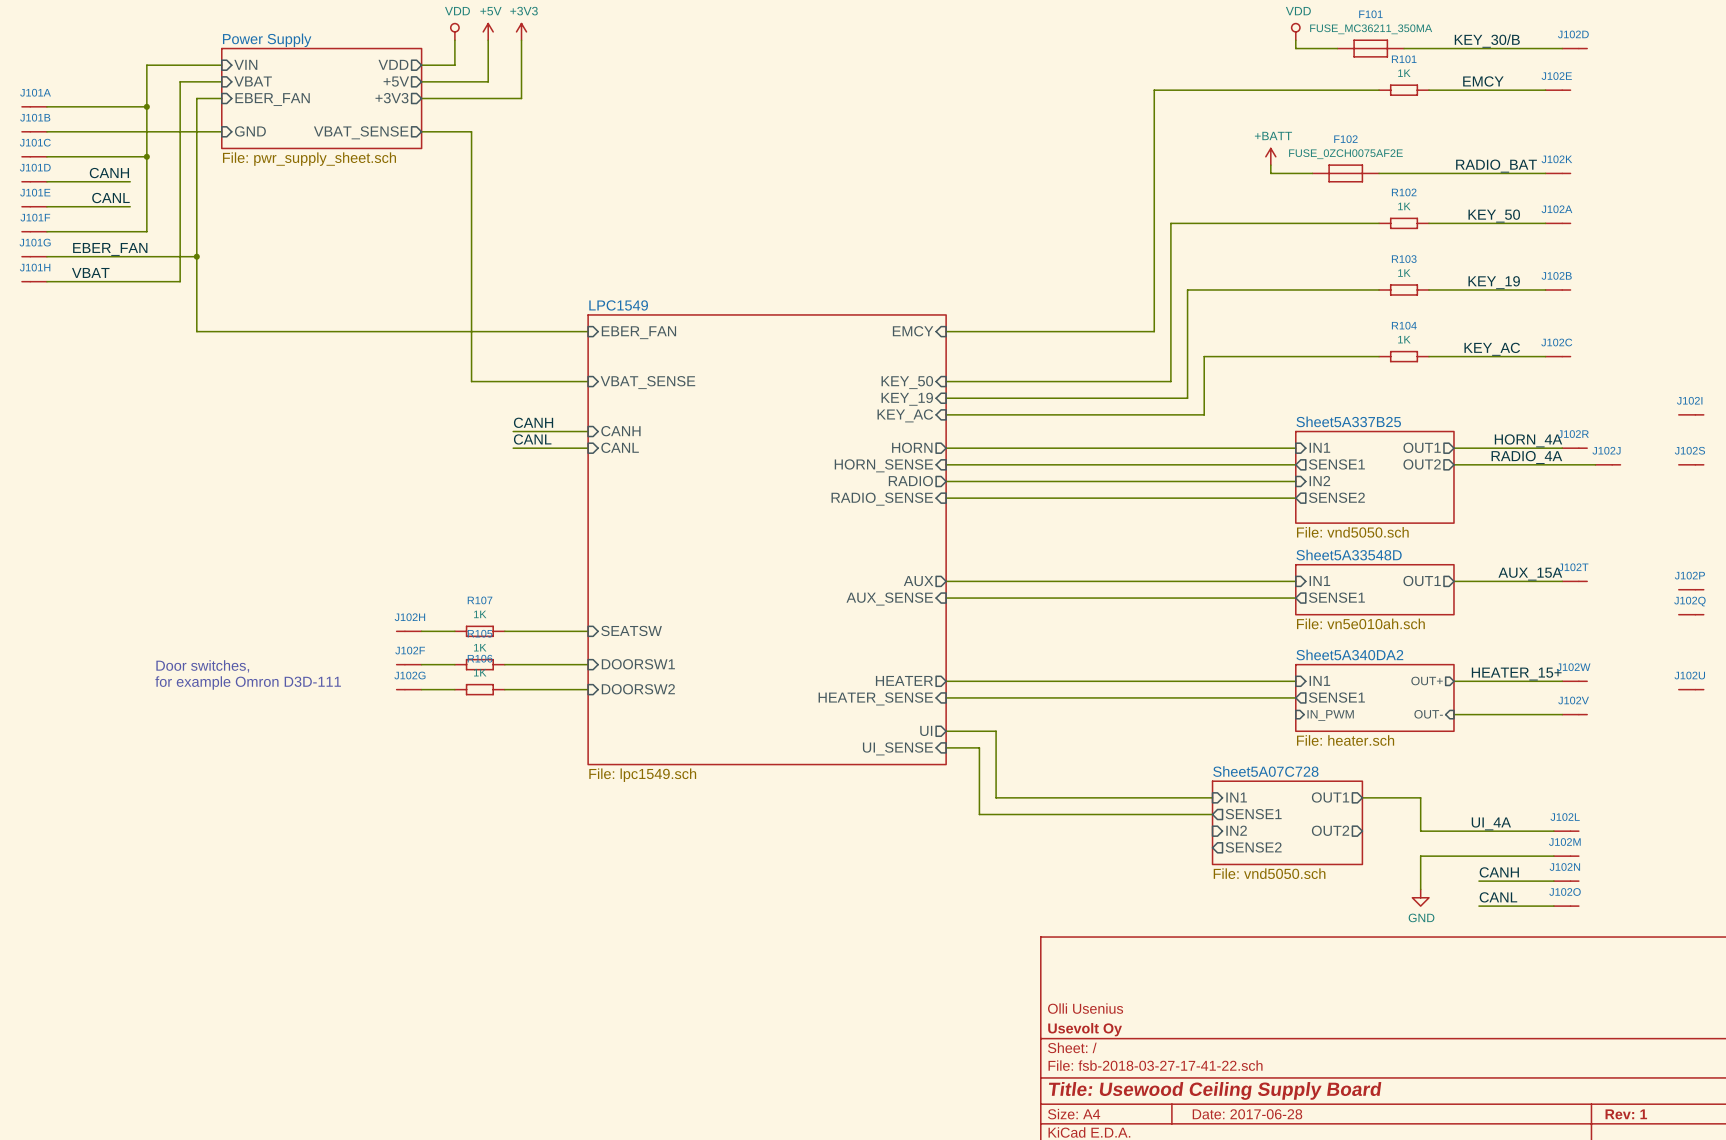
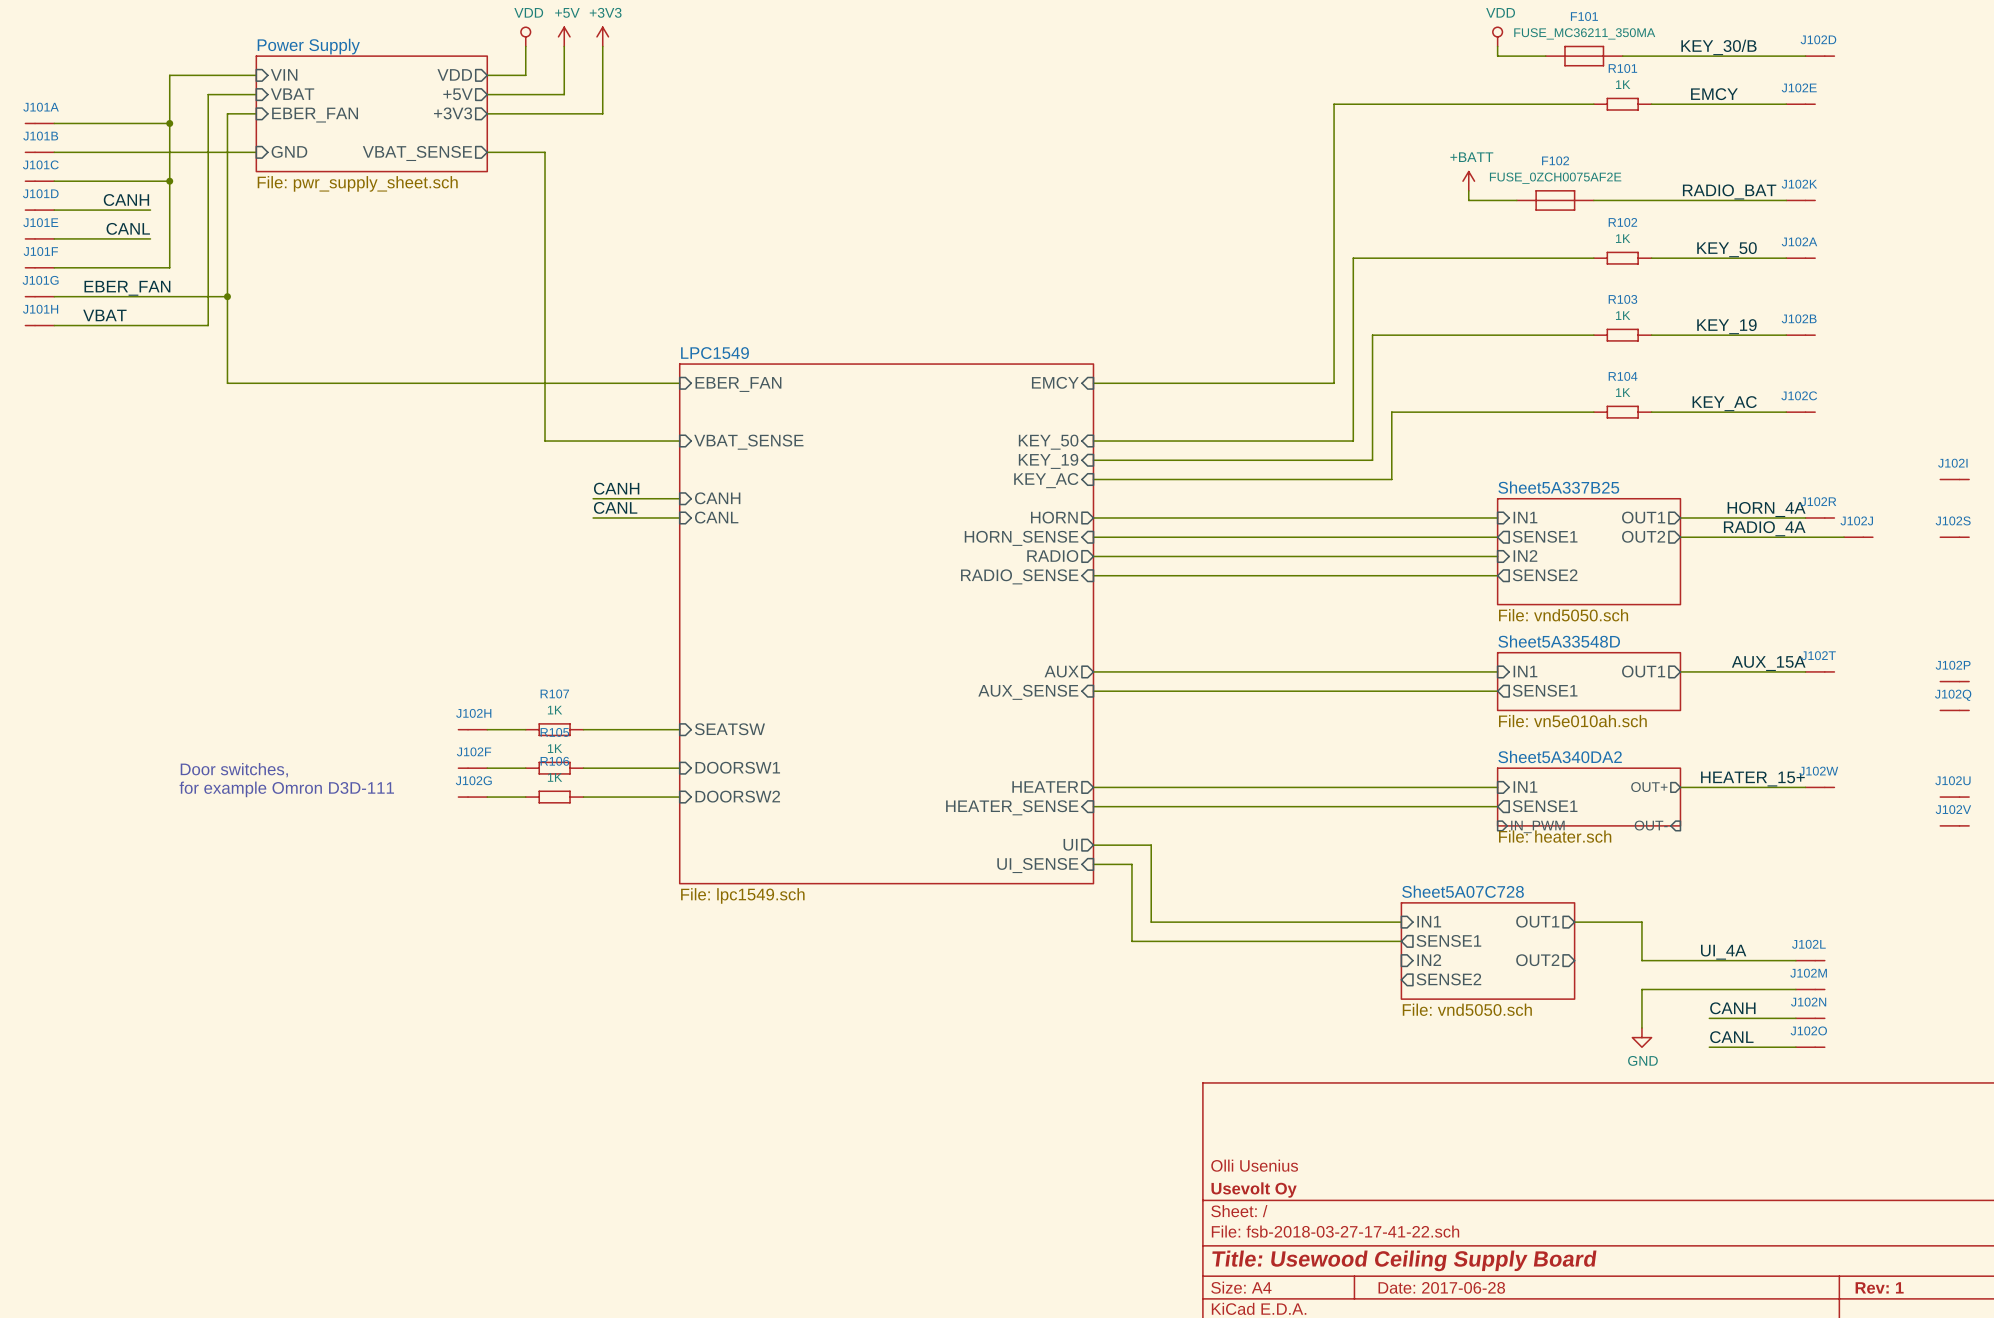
sheet Sheet5A340DA2 shape: [1295, 664, 1454, 732] -> [1497, 768, 1681, 826]
wire: (1453, 714) (1562, 714) -> none
J102V position: (1574, 714) -> (1954, 825)

